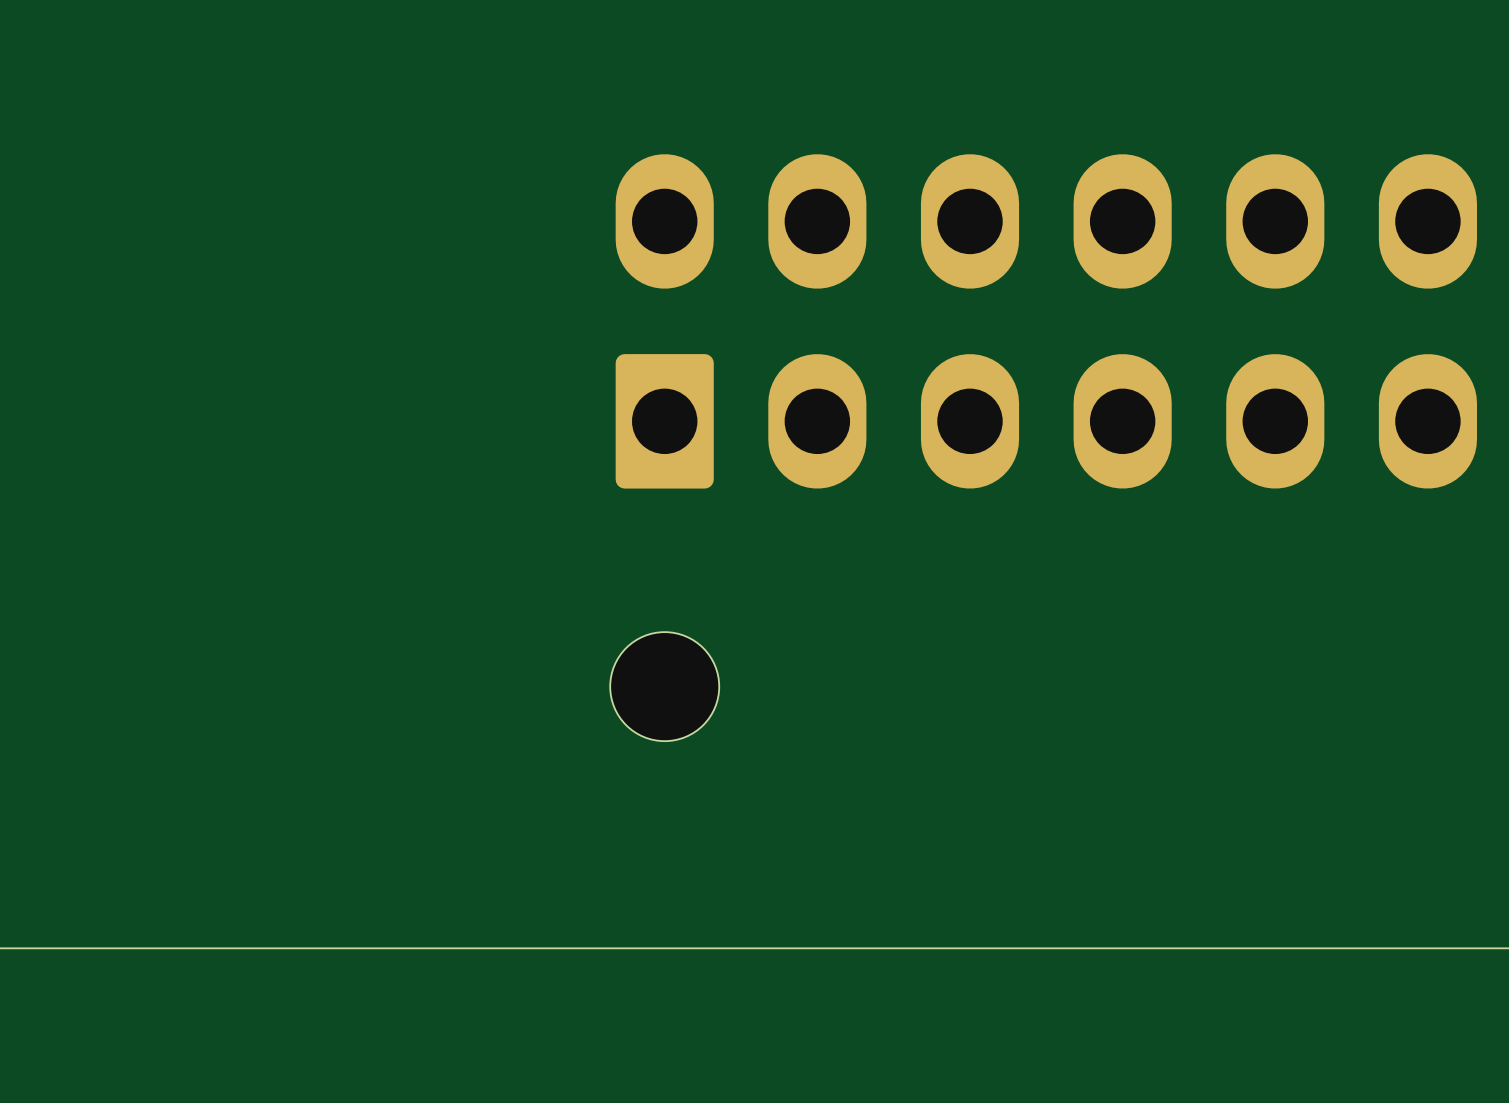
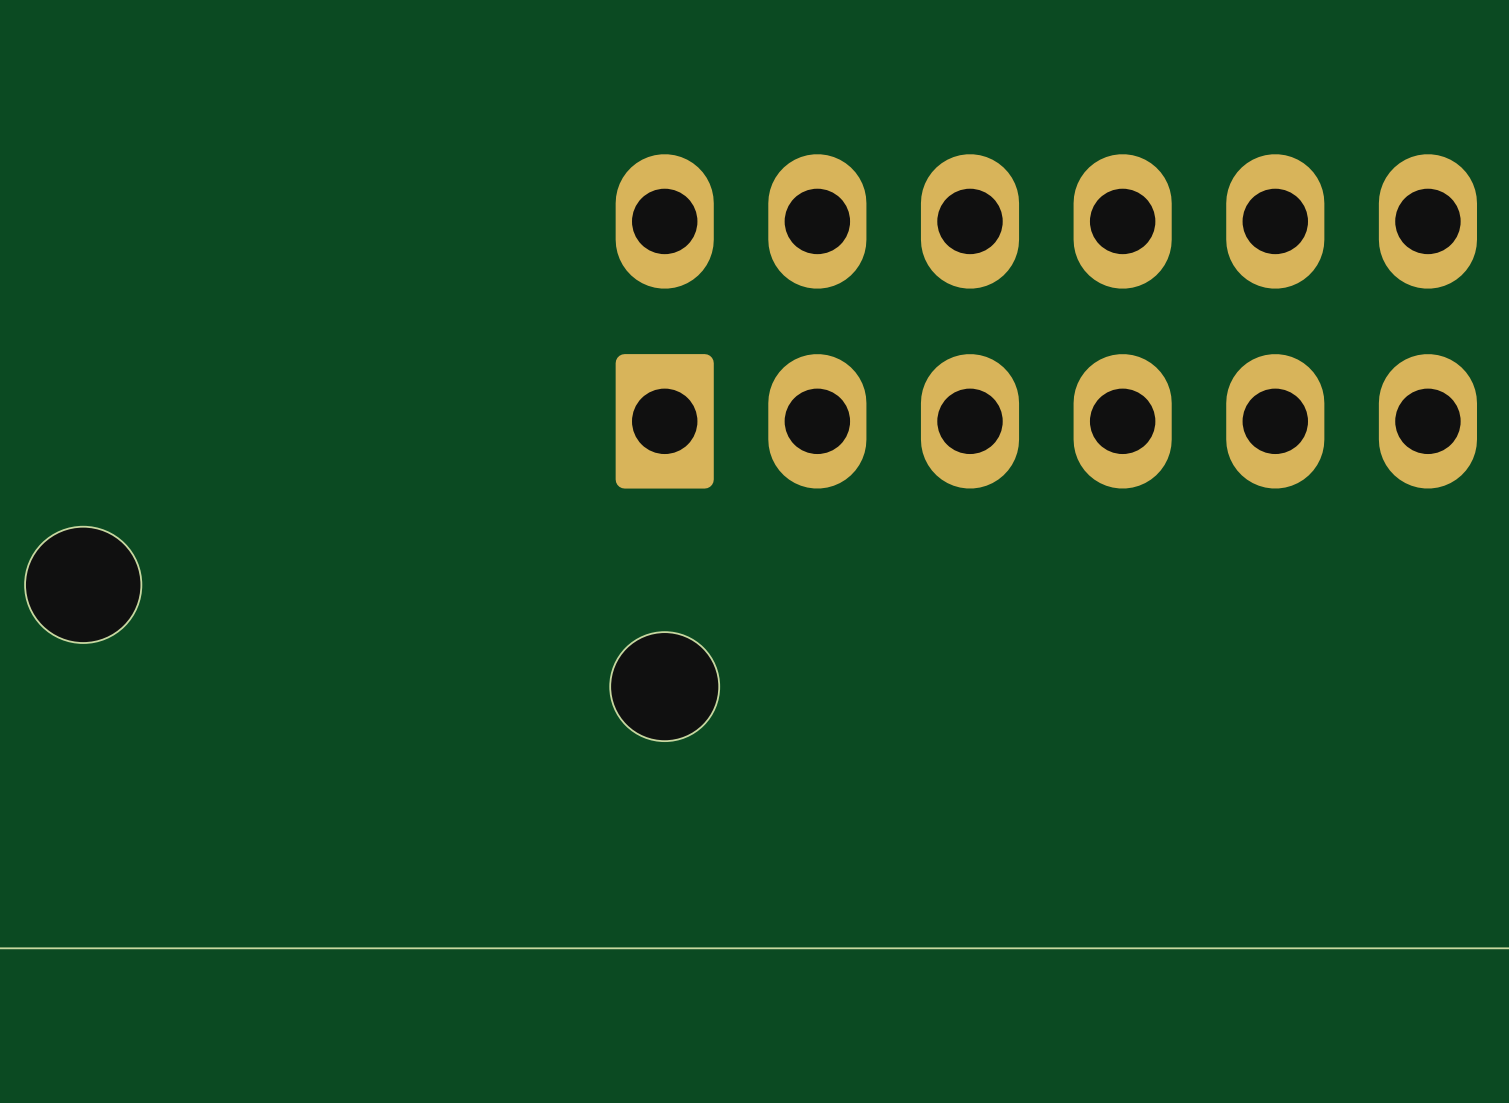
part: none -> (83, 584)

